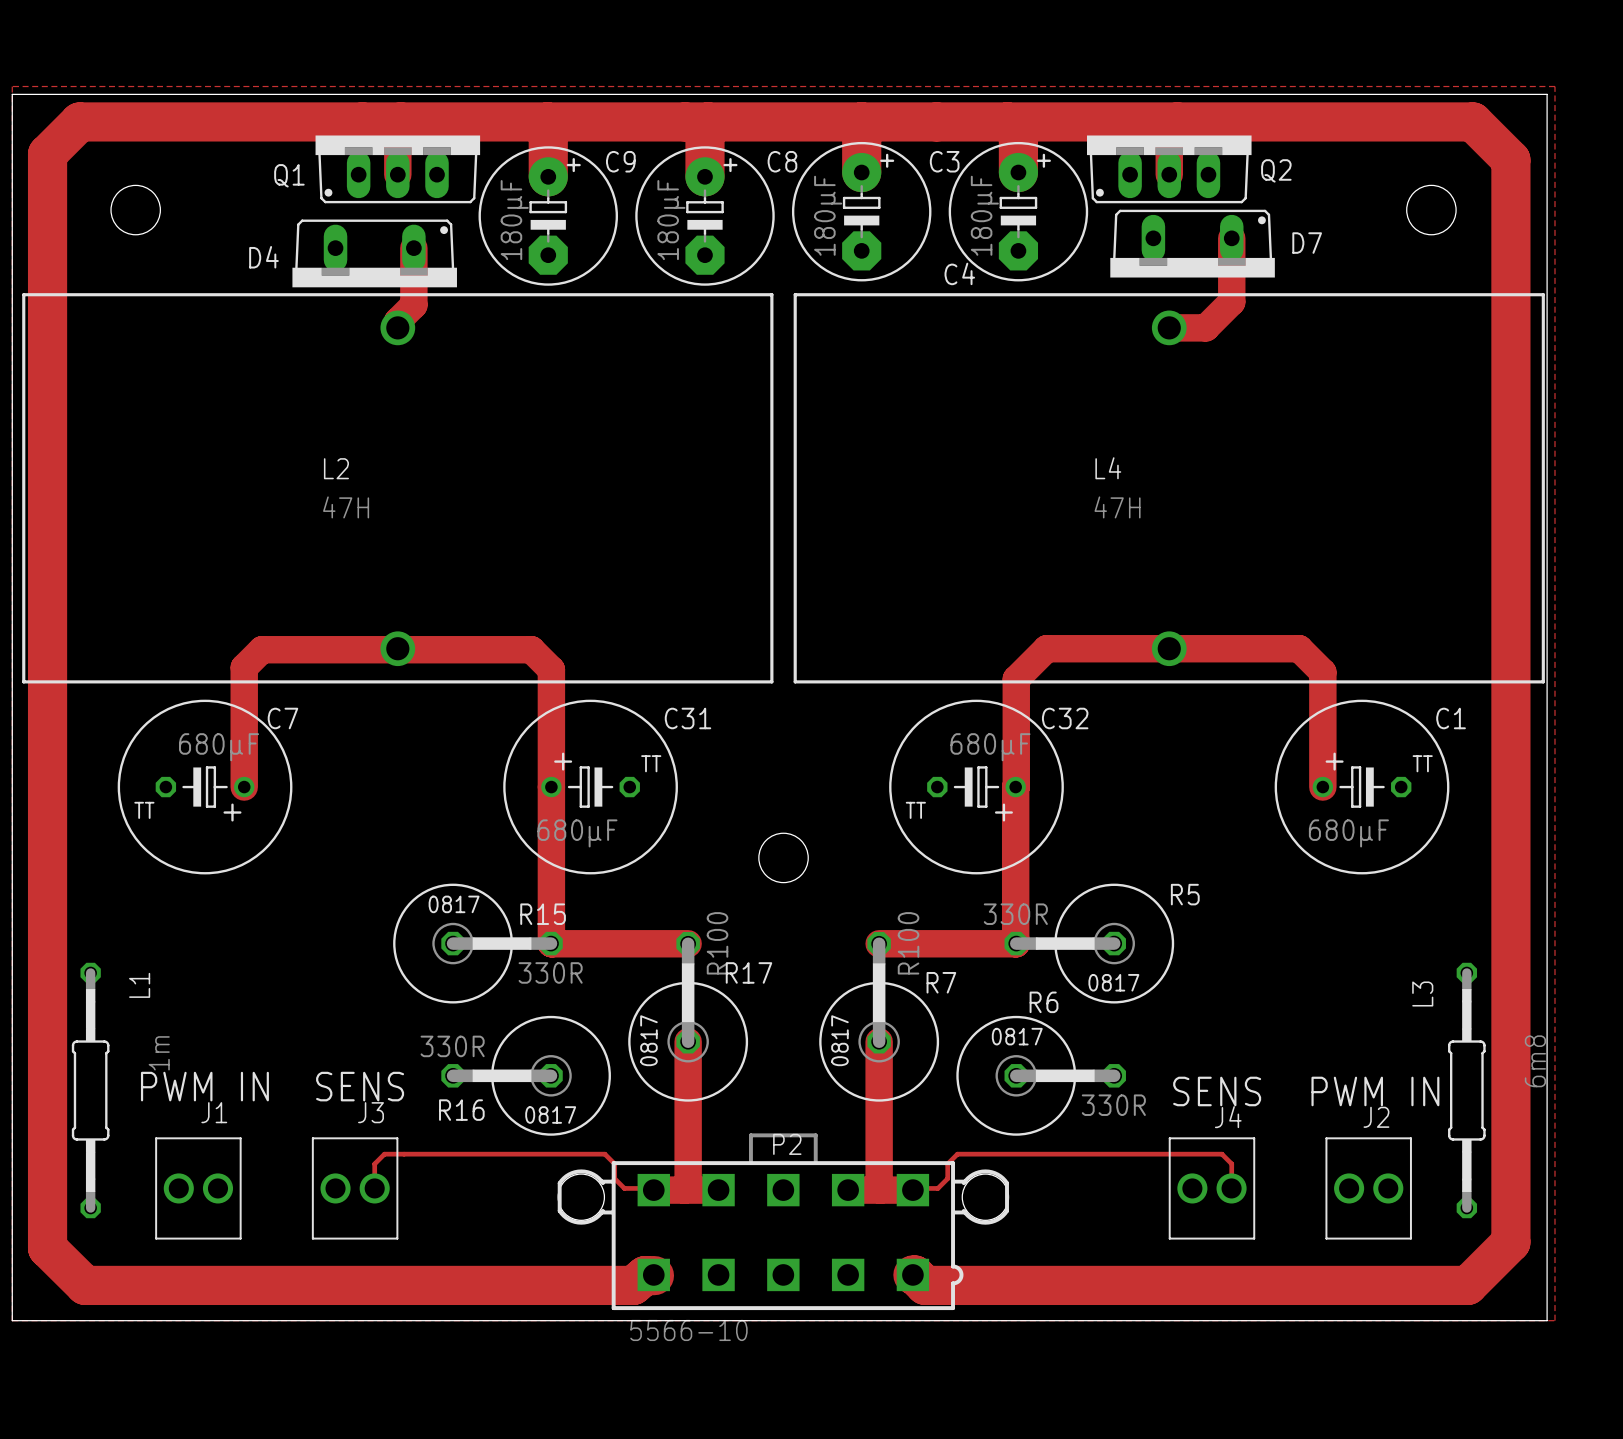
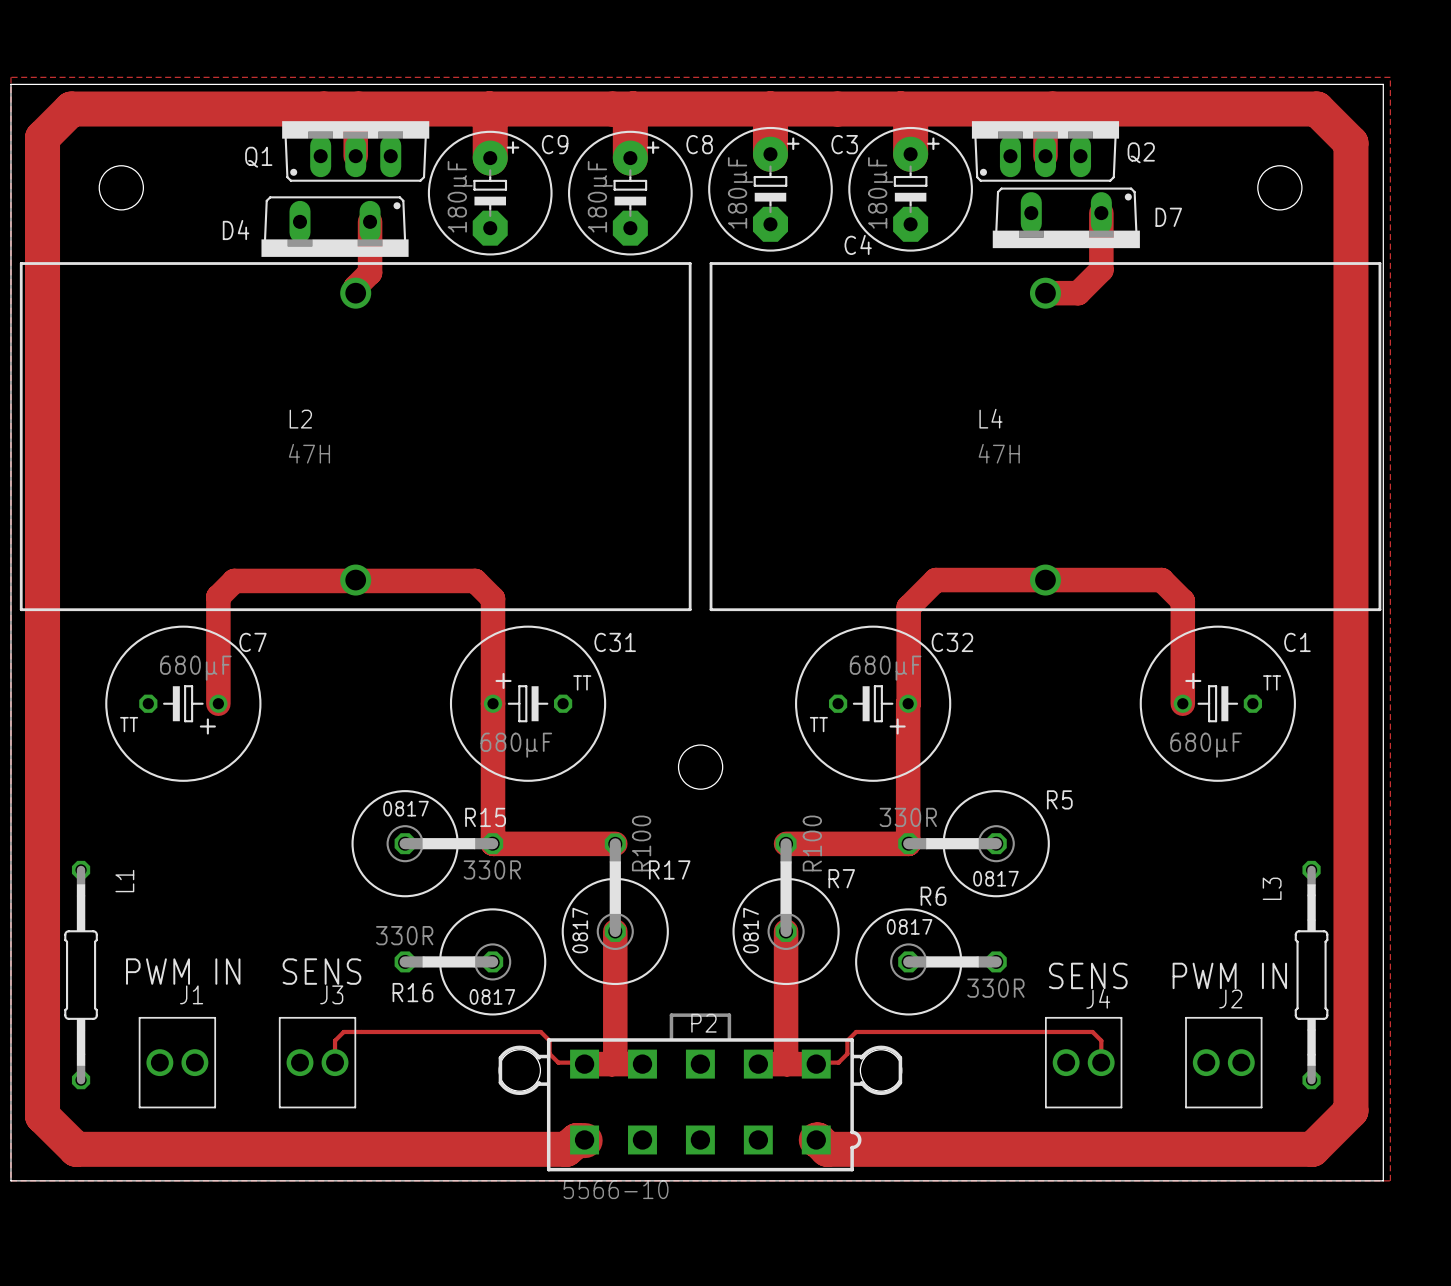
L1 value: 1m (159, 1053) -> none
L3 value: 6m8 (1535, 1061) -> none

